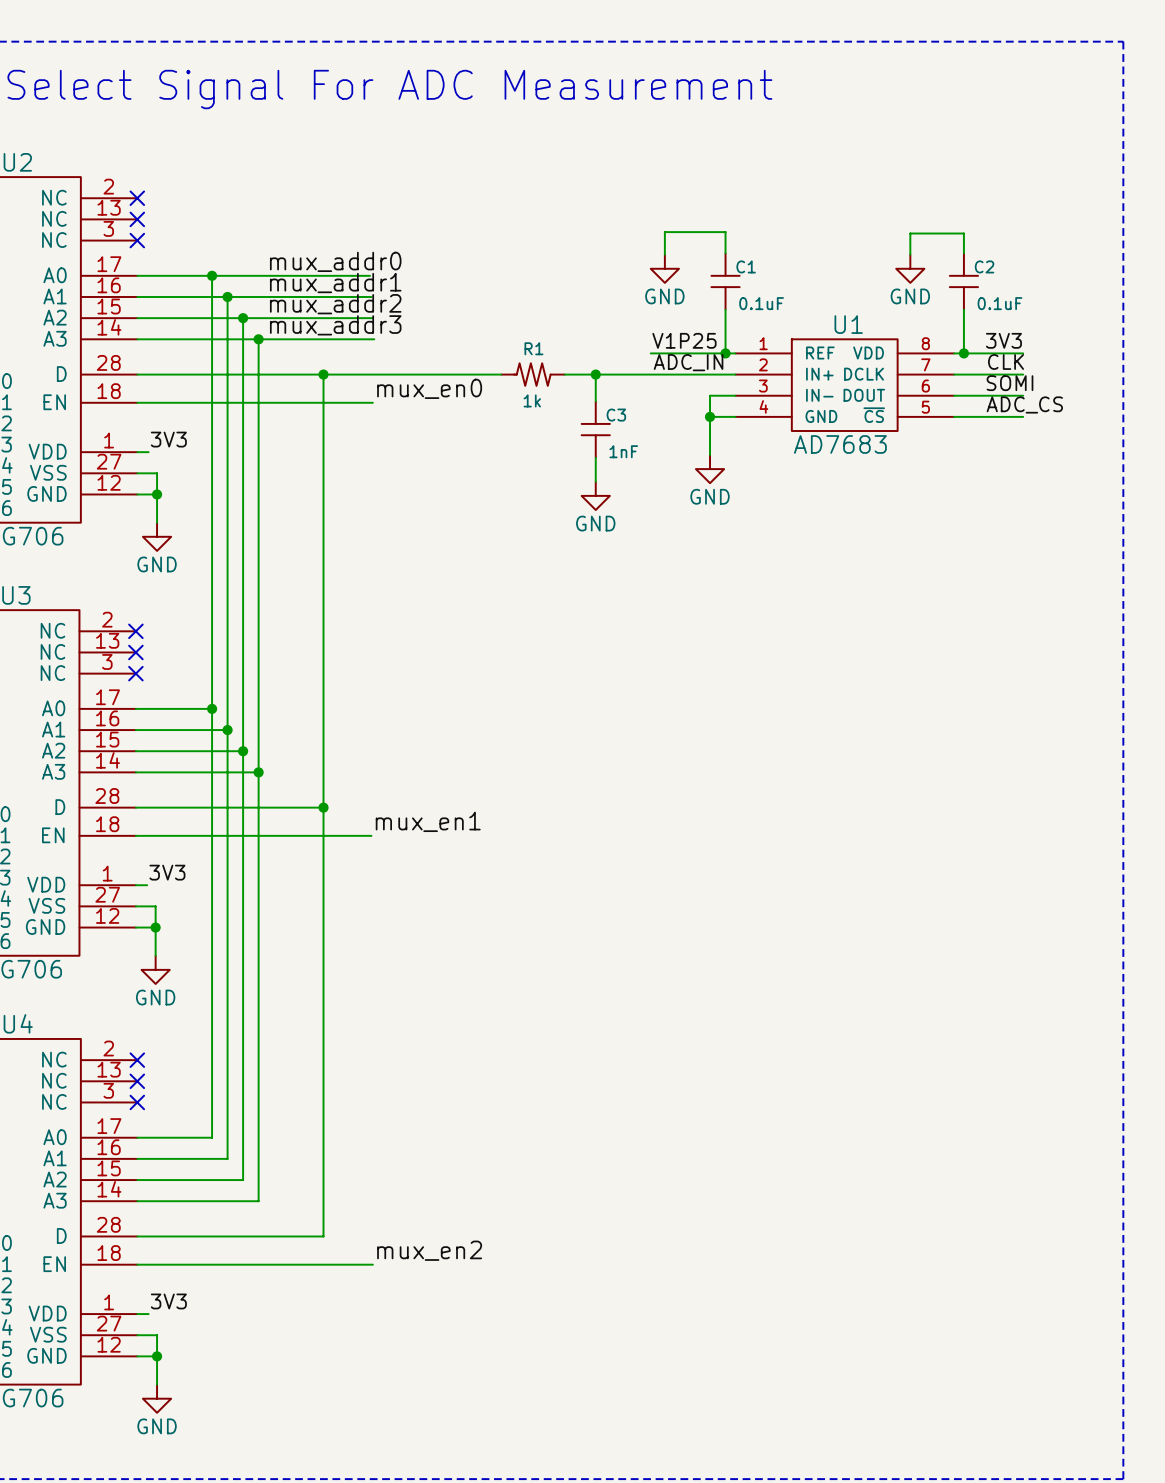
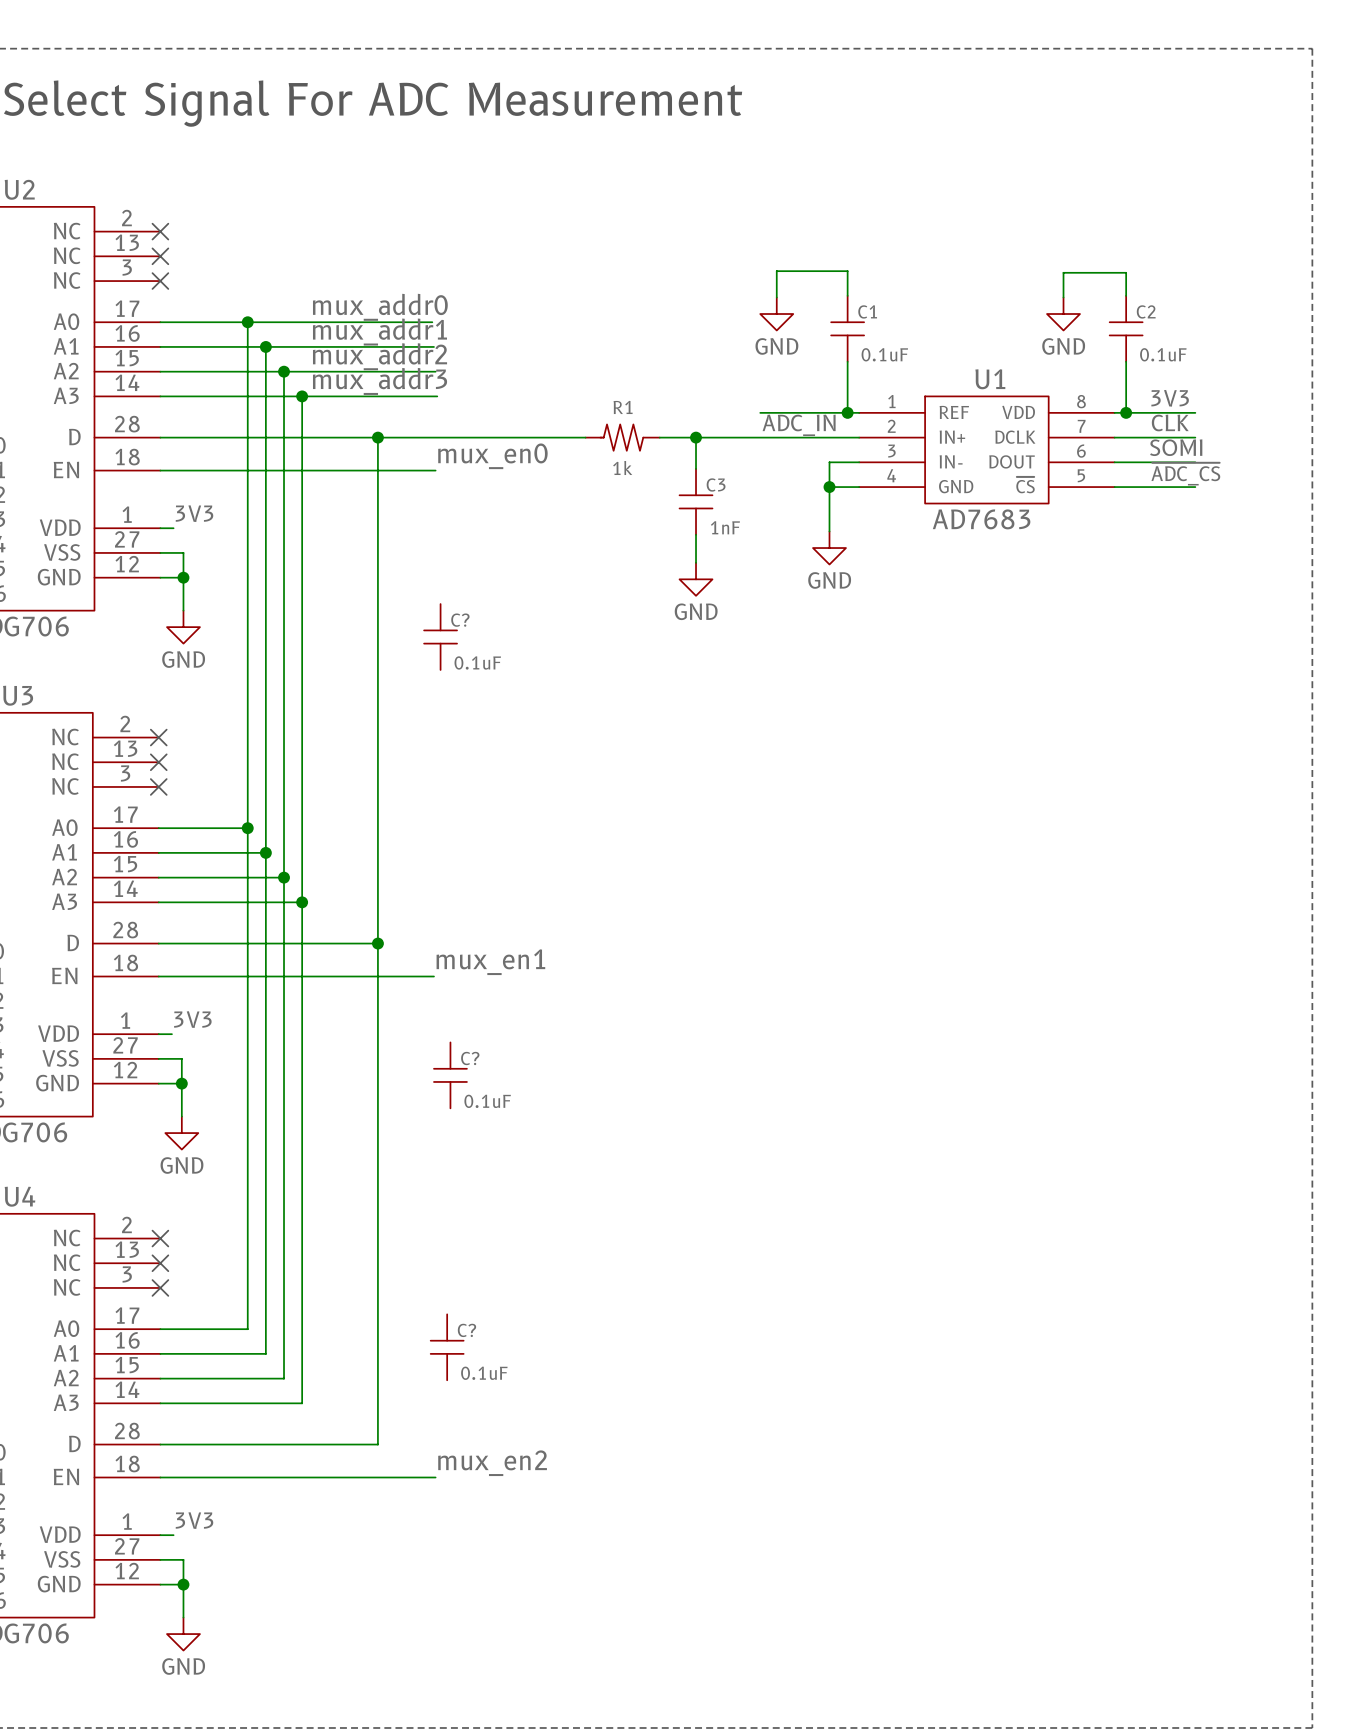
label: V1P25 (684, 340) -> none
label: ADC_CS (1024, 404) -> ~{ADC_CS} (1185, 474)
C?: none -> 0.1uF (440, 637)
C?: none -> 0.1uF (450, 1075)
C?: none -> 0.1uF (447, 1347)

